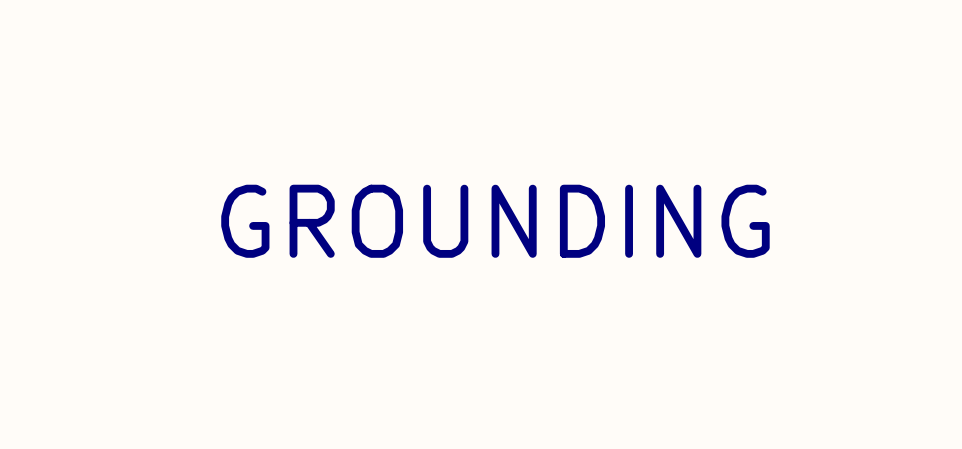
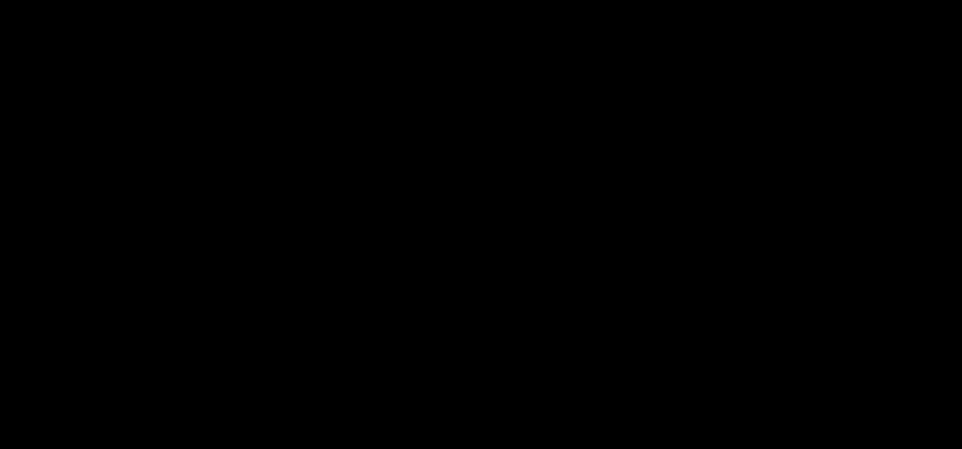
text: GROUNDING (495, 221) -> none

